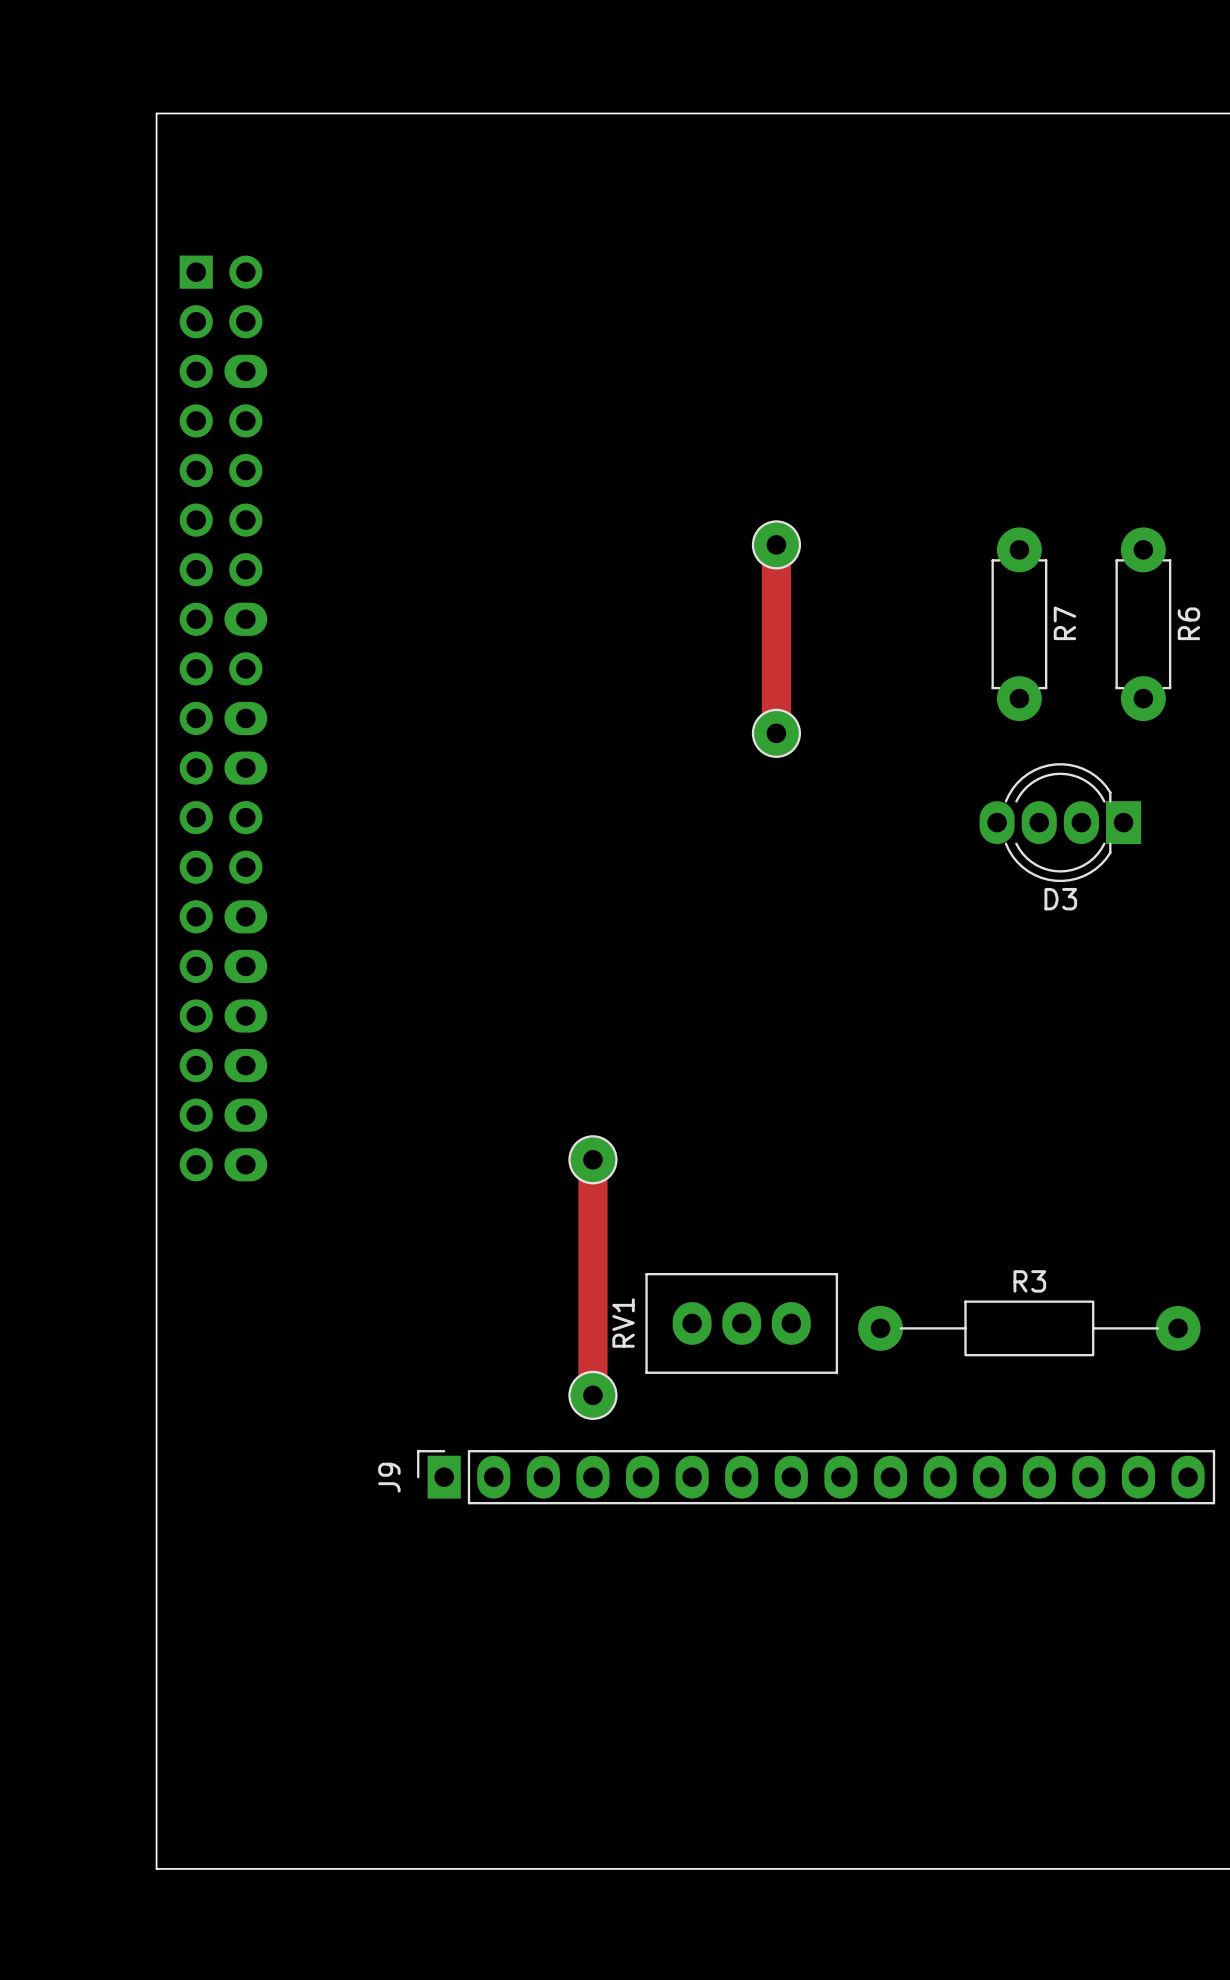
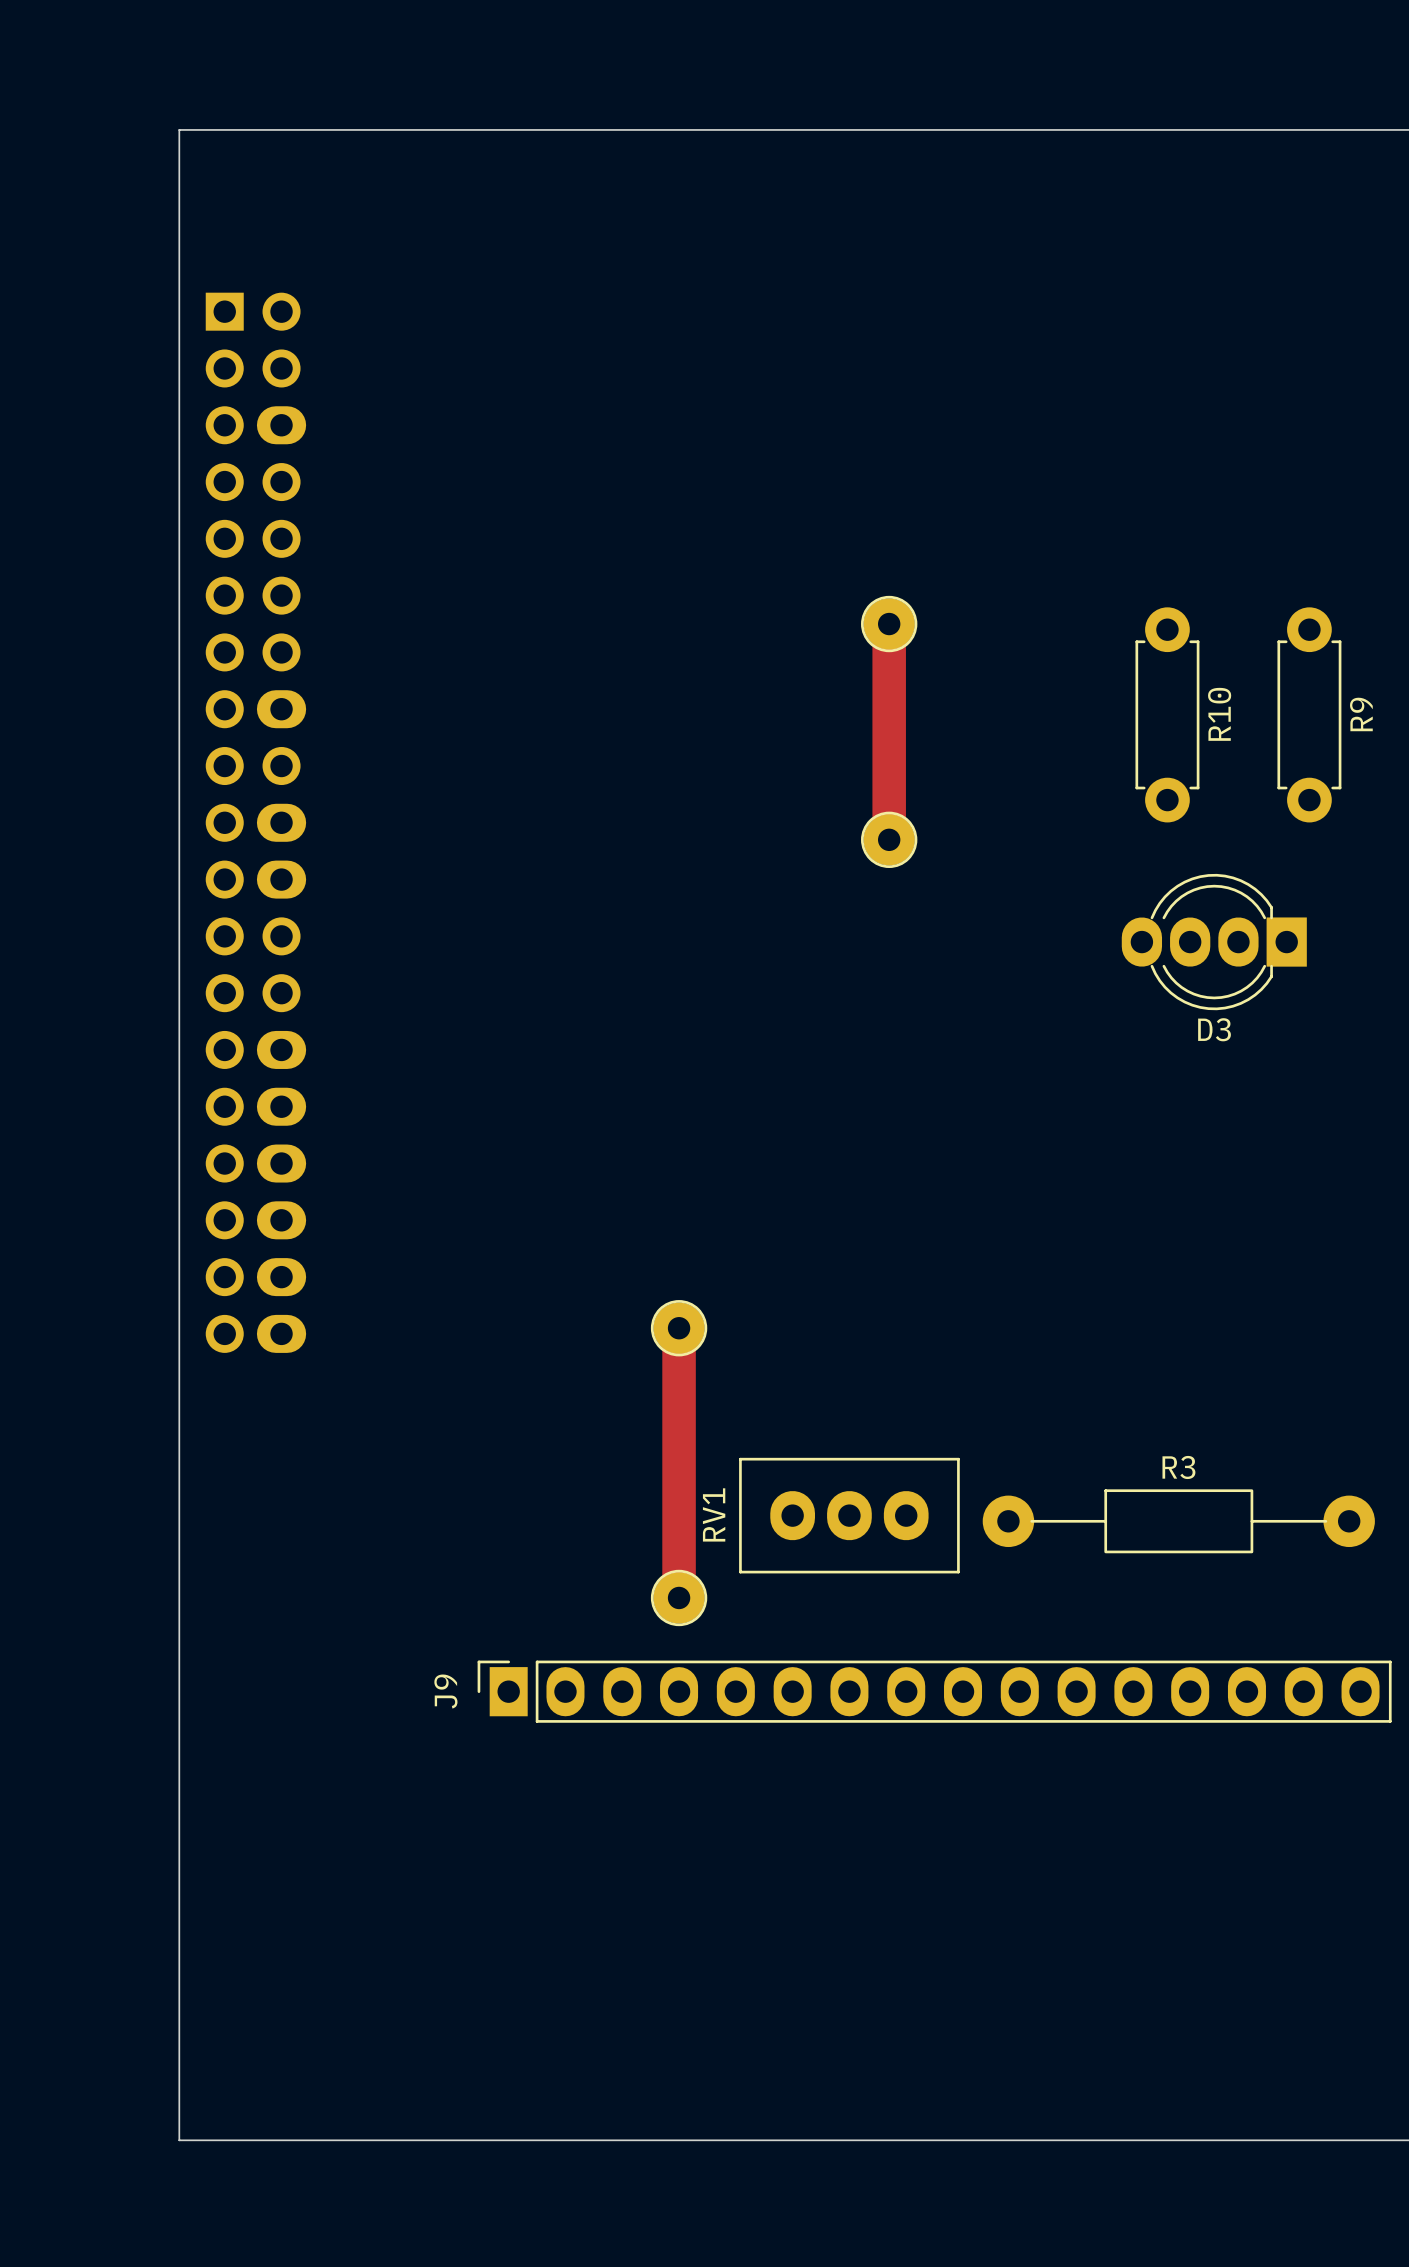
R7: (1019, 624) -> none
R10: none -> (1167, 714)
R6: (1143, 624) -> none
R9: none -> (1309, 714)

